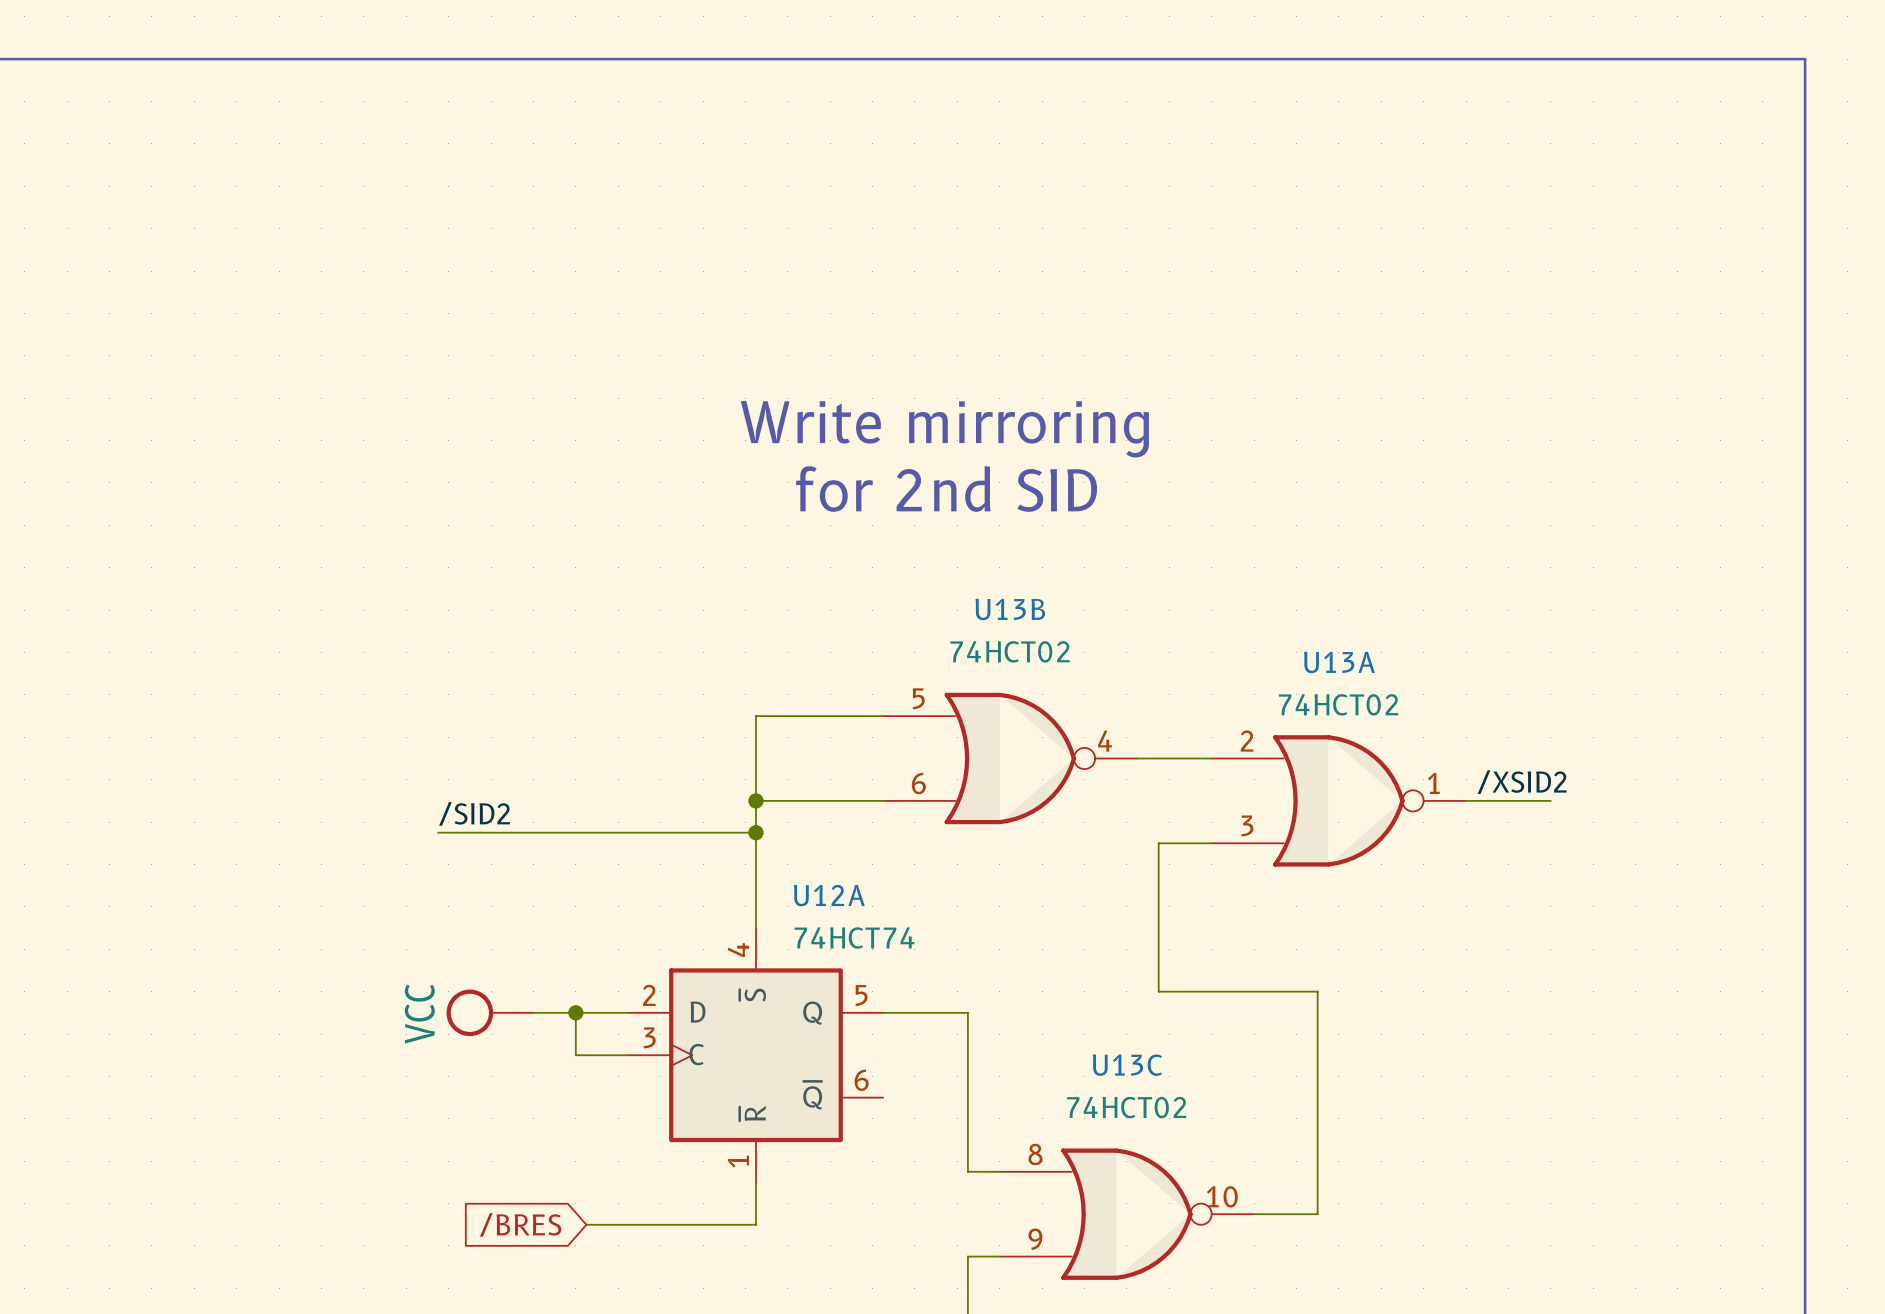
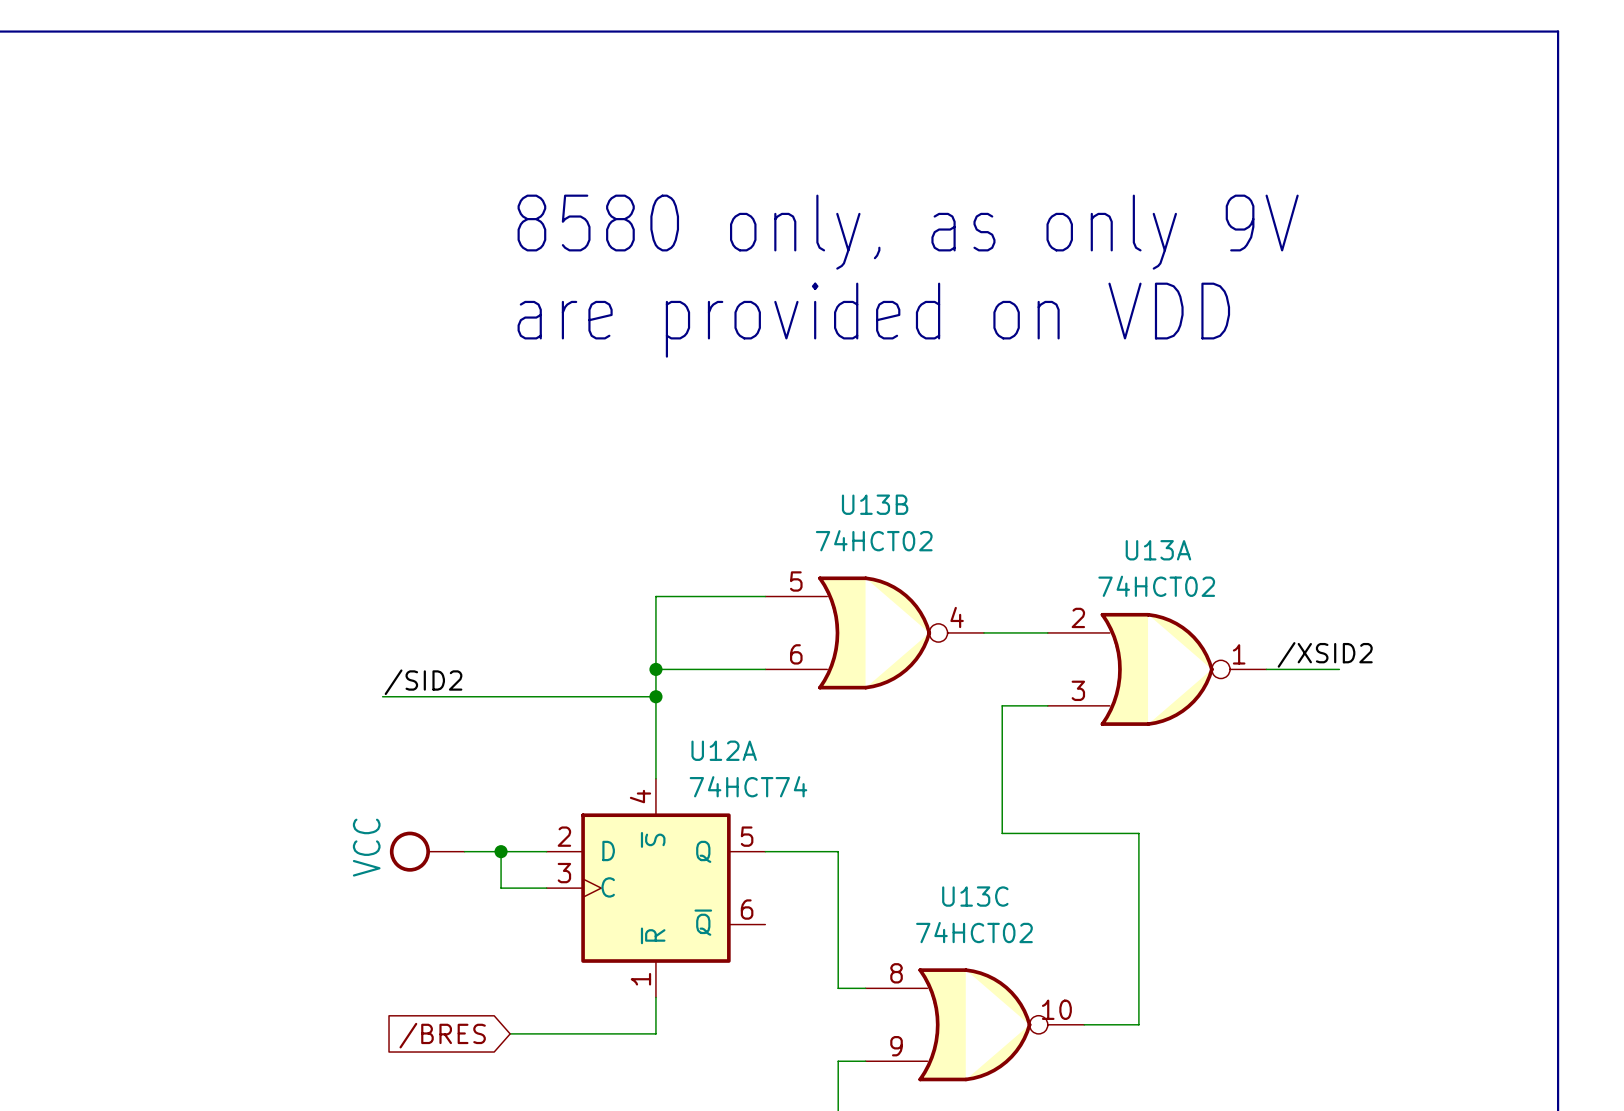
text: none -> 8580 only, as only 9V (908, 232)
text: none -> are provided on VDD (873, 320)
text: Write mirroring (944, 429) -> none
text: for 2nd SID (946, 488) -> none

